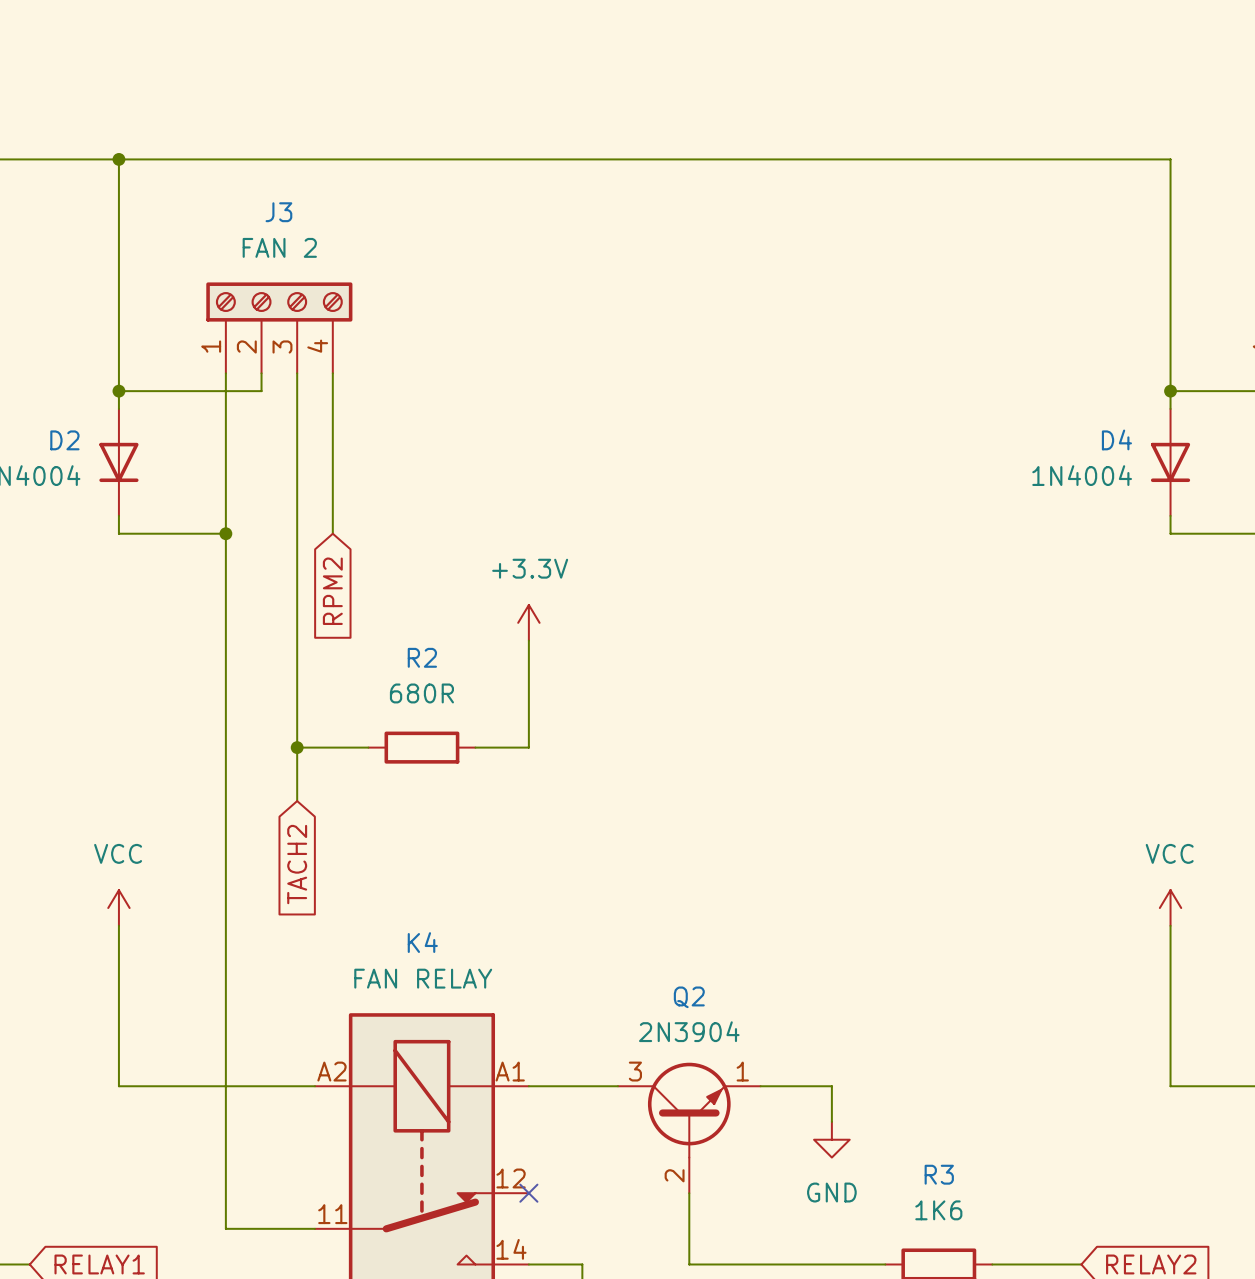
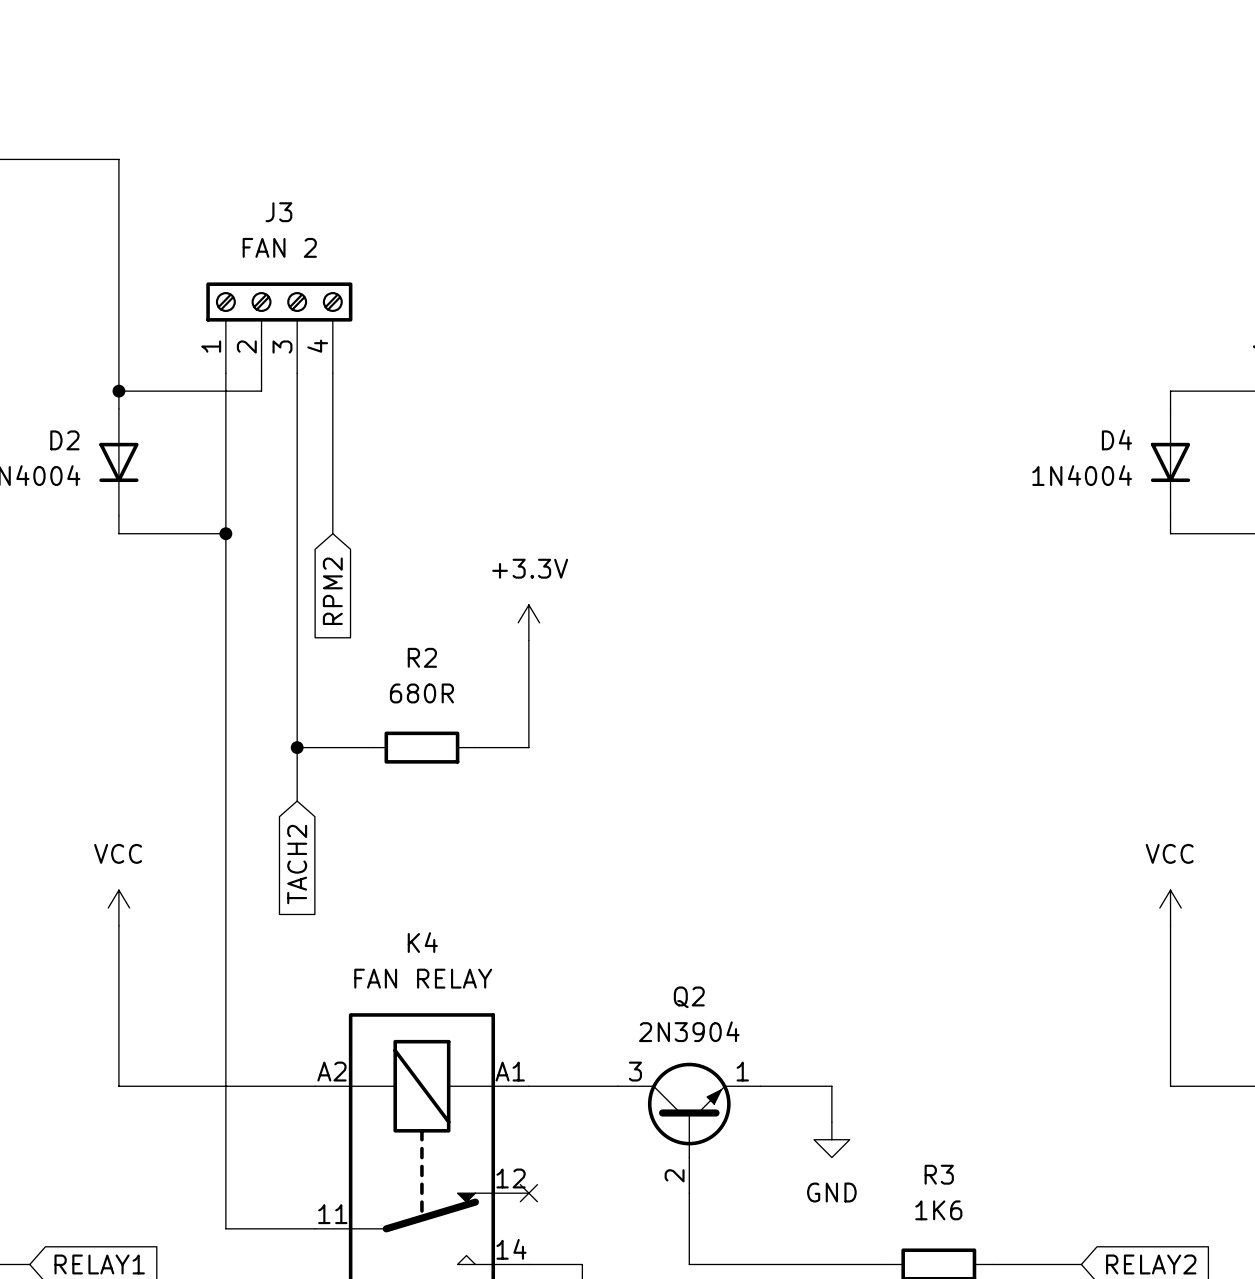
wire: (118, 159) (1170, 159) (1170, 391) -> none
junction: (118, 159) -> none
junction: (1170, 391) -> none

